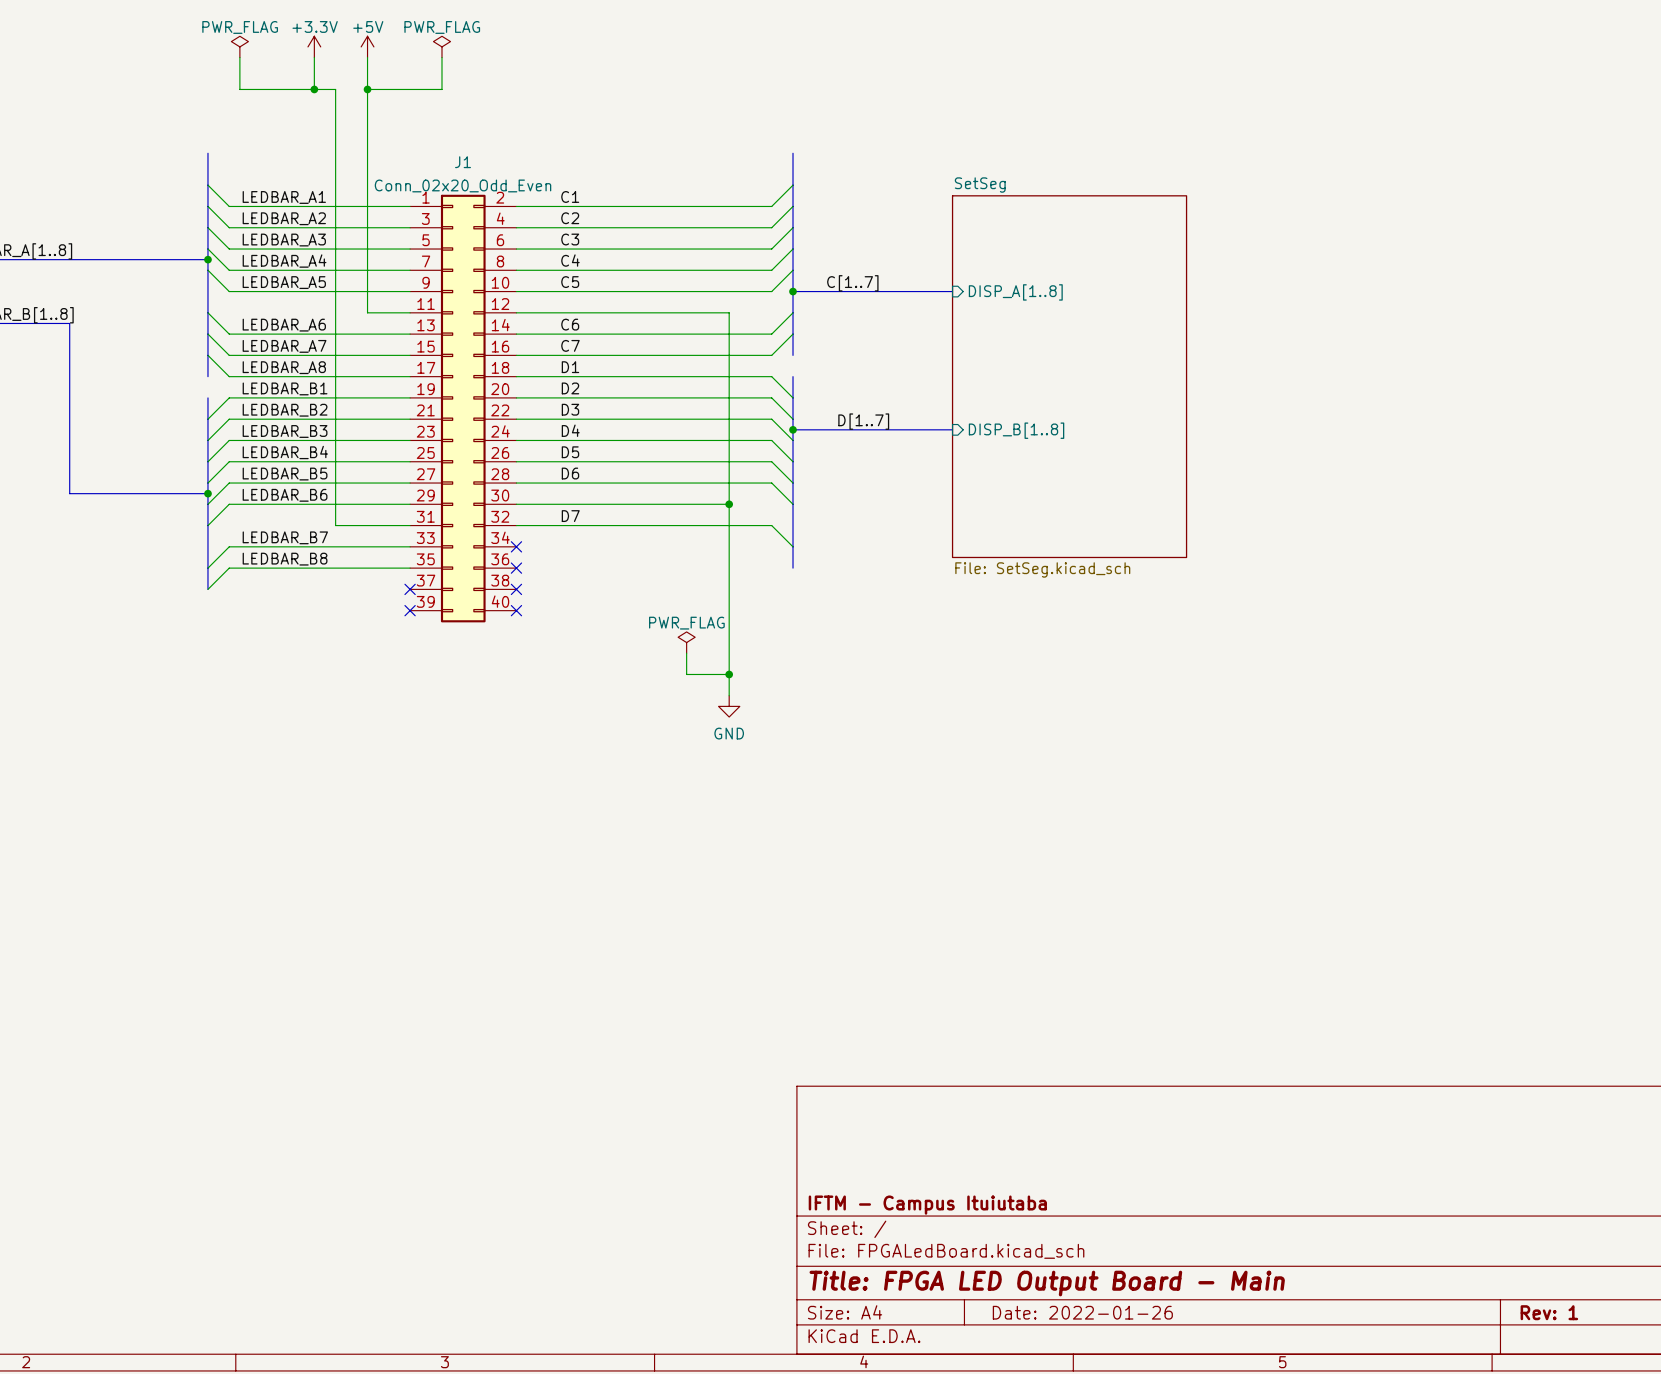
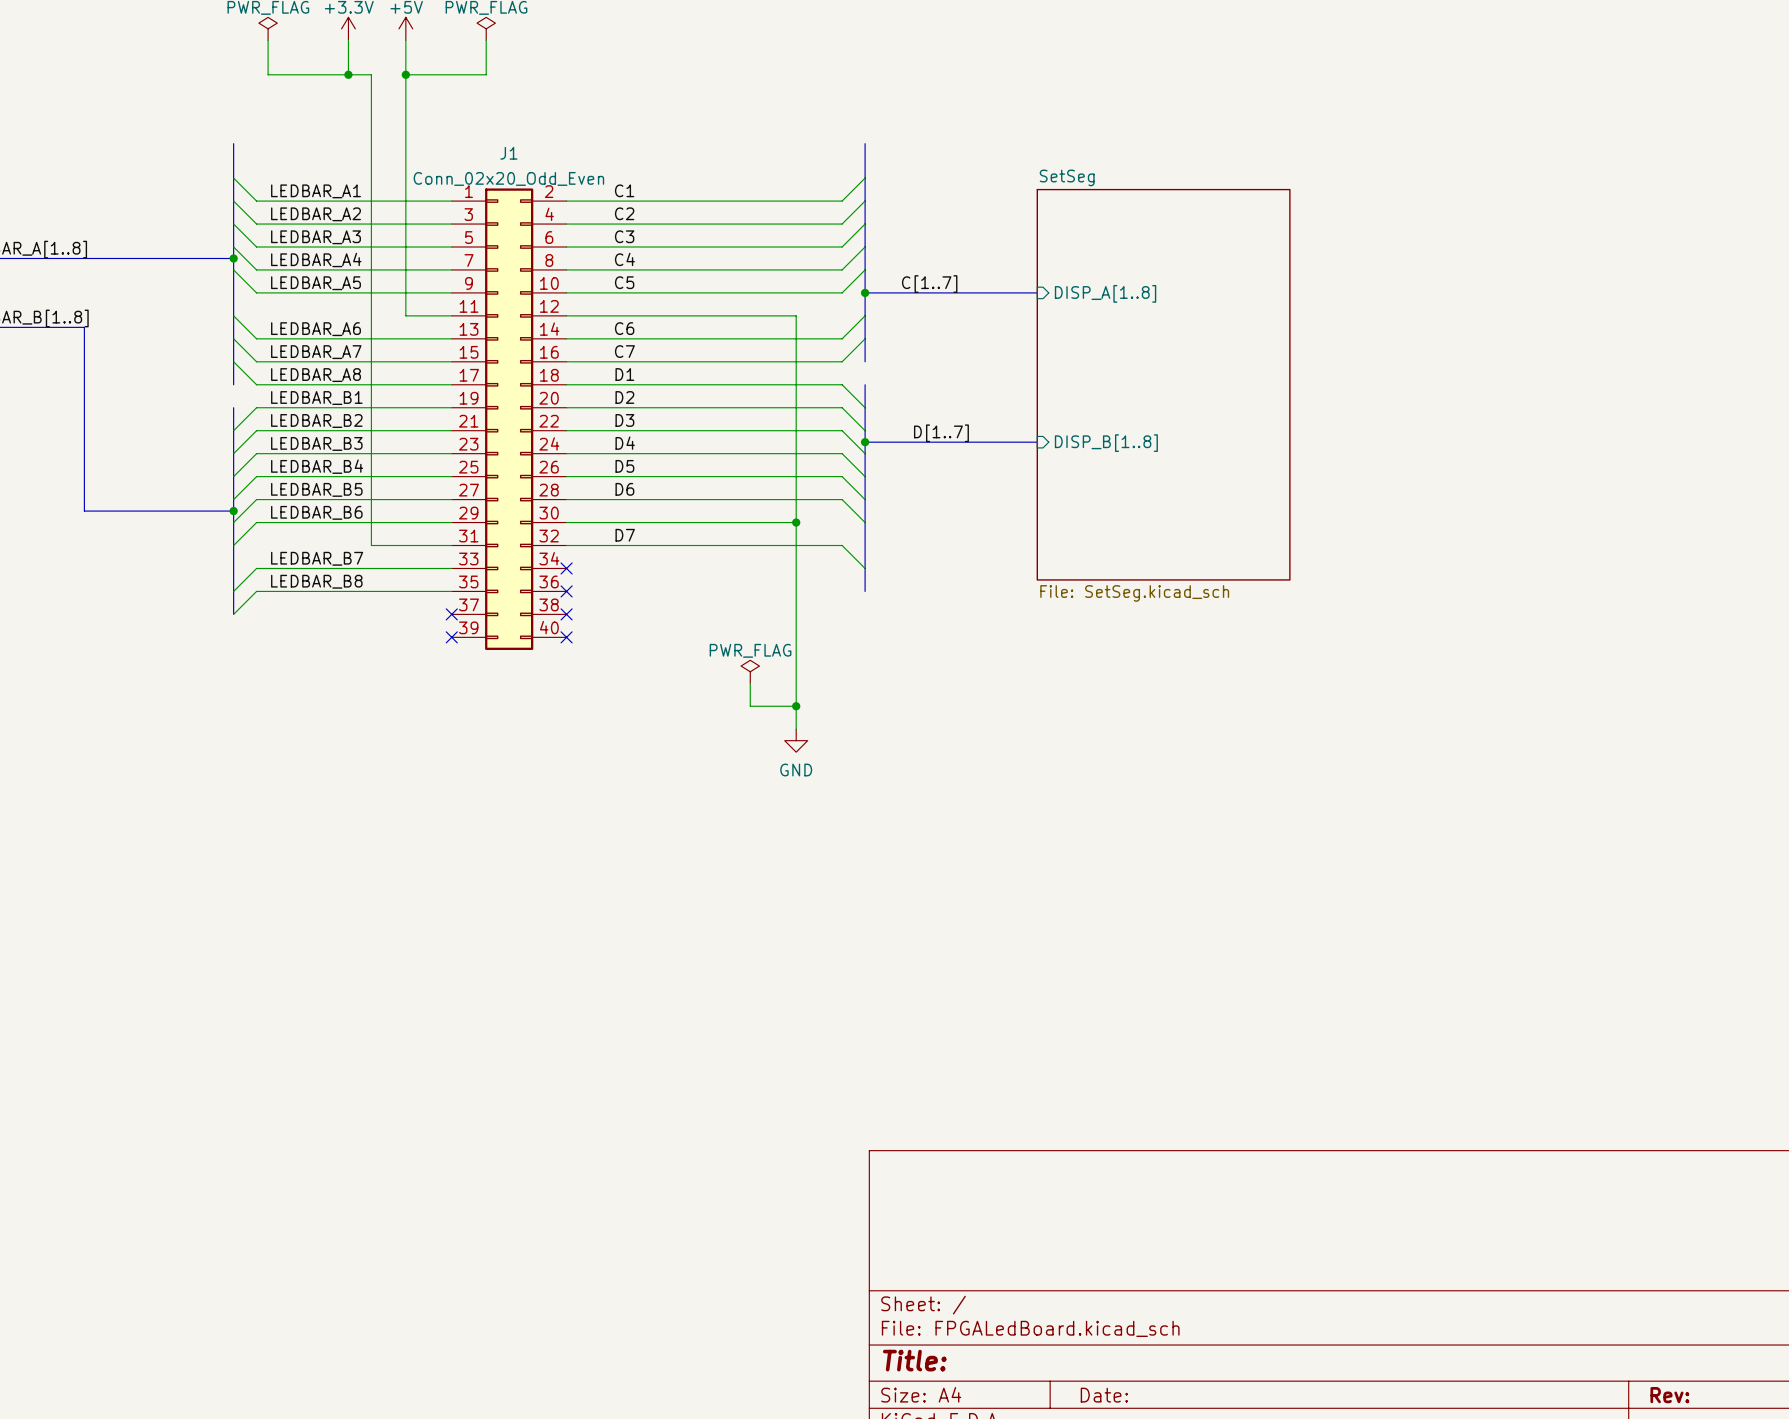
title block: IFTM - Campus Ituiutaba (927, 1205) -> none
title block: Title: FPGA LED Output Board - Main (1047, 1283) -> Title: (914, 1360)
title block: Date: 2022-01-26 (1082, 1312) -> Date: (1104, 1395)
title block: Rev: 1 (1549, 1312) -> Rev: (1669, 1395)

